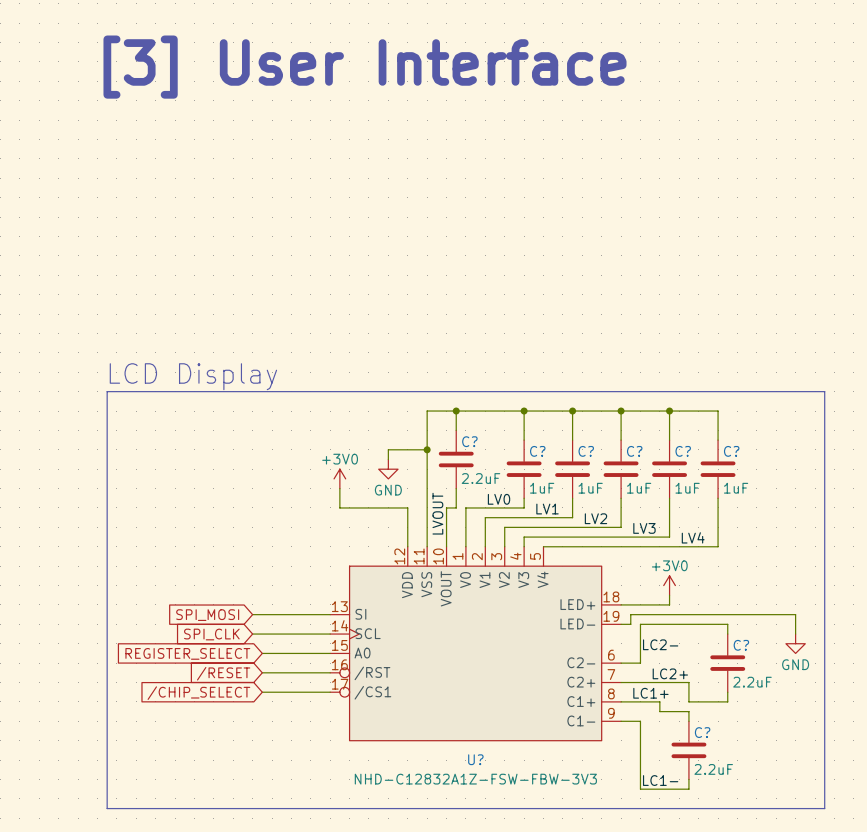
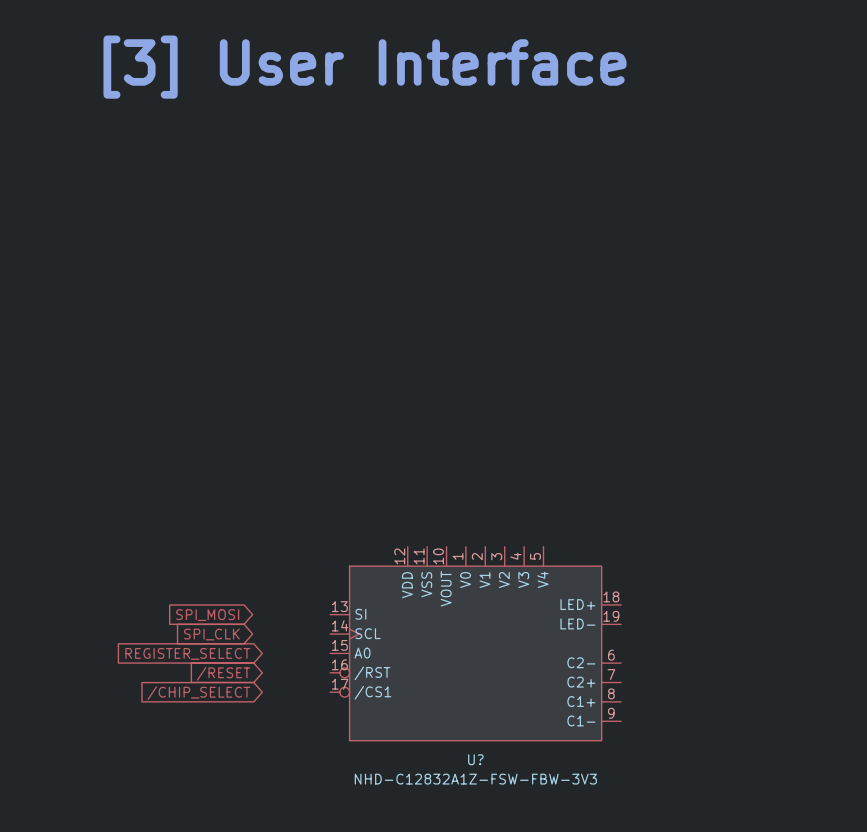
text: LCD Display (193, 376) -> none
line: (107, 391) (824, 391) (824, 808) (107, 808) (107, 391) -> none
wire: (456, 411) (456, 430) -> none
junction: (456, 411) -> none
wire: (524, 411) (524, 440) -> none
junction: (524, 411) -> none
wire: (572, 411) (572, 440) -> none
junction: (572, 411) -> none
wire: (621, 411) (621, 440) -> none
junction: (621, 411) -> none
wire: (669, 411) (669, 440) -> none
junction: (669, 411) -> none
wire: (718, 440) (718, 411) (427, 411) (427, 546) -> none
wire: (427, 449) (388, 449) (388, 459) -> none
junction: (427, 449) -> none
C?: 2.2uF (456, 459) -> none
power symbol: GND (388, 469) -> none
C?: 1uF (524, 469) -> none
C?: 1uF (572, 469) -> none
C?: 1uF (621, 469) -> none
C?: 1uF (669, 469) -> none
C?: 1uF (718, 469) -> none
power symbol: +3V0 (339, 478) -> none
wire: (339, 488) (339, 507) (407, 507) (407, 546) -> none
wire: (456, 488) (456, 507) (446, 507) (446, 546) -> none
wire: (524, 498) (524, 507) (465, 507) (465, 546) -> none
wire: (572, 498) (572, 517) (485, 517) (485, 546) -> none
wire: (621, 498) (621, 527) (504, 527) (504, 546) -> none
wire: (669, 498) (669, 537) (524, 537) (524, 546) -> none
wire: (718, 498) (718, 546) (543, 546) -> none
label: LV0 (499, 499) -> none
label: LV1 (547, 509) -> none
label: LVOUT (437, 513) -> none
label: LV2 (595, 518) -> none
label: LV3 (644, 528) -> none
label: LV4 (693, 537) -> none
power symbol: +3V0 (669, 585) -> none
wire: (669, 595) (669, 604) (621, 604) -> none
wire: (252, 614) (330, 614) -> none
wire: (621, 624) (630, 624) (630, 614) (795, 614) (795, 634) -> none
wire: (252, 634) (330, 634) -> none
wire: (727, 634) (727, 624) (640, 624) (640, 663) (621, 663) -> none
power symbol: GND (795, 643) -> none
label: LC2- (660, 644) -> none
wire: (262, 653) (330, 653) -> none
C?: 2.2uF (727, 663) -> none
wire: (262, 672) (330, 672) -> none
label: LC2+ (670, 673) -> none
wire: (621, 682) (688, 682) (688, 701) (727, 701) (727, 692) -> none
wire: (262, 692) (330, 692) -> none
label: LC1+ (650, 693) -> none
wire: (621, 701) (659, 701) (659, 711) (688, 711) (688, 721) -> none
wire: (621, 721) (640, 721) (640, 789) (688, 789) (688, 779) -> none
C?: 2.2uF (688, 750) -> none
label: LC1- (660, 780) -> none

